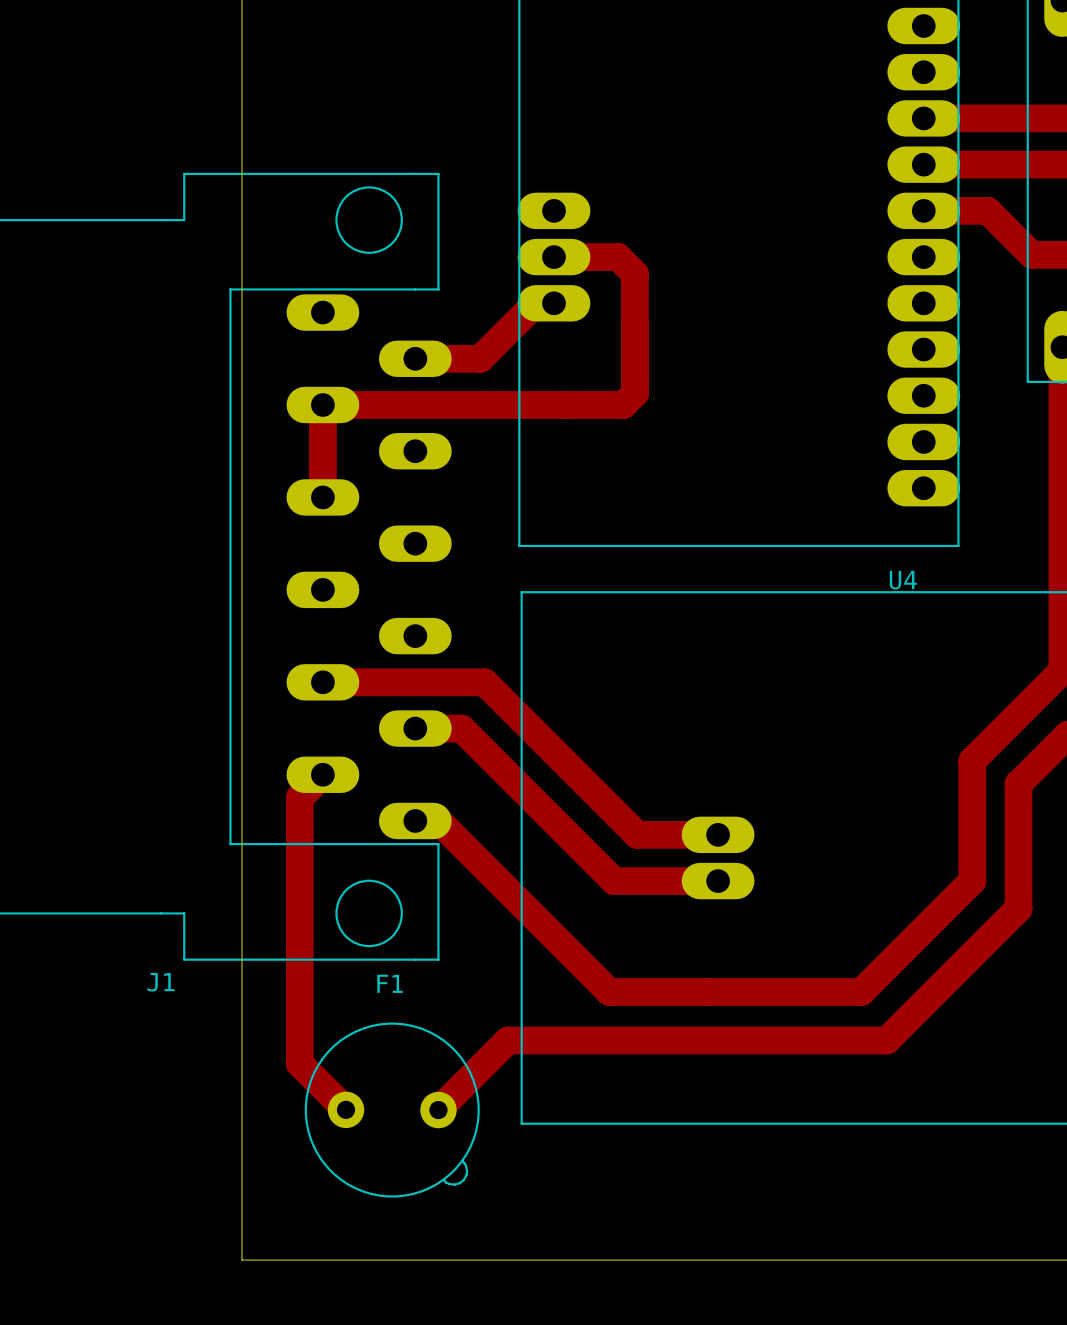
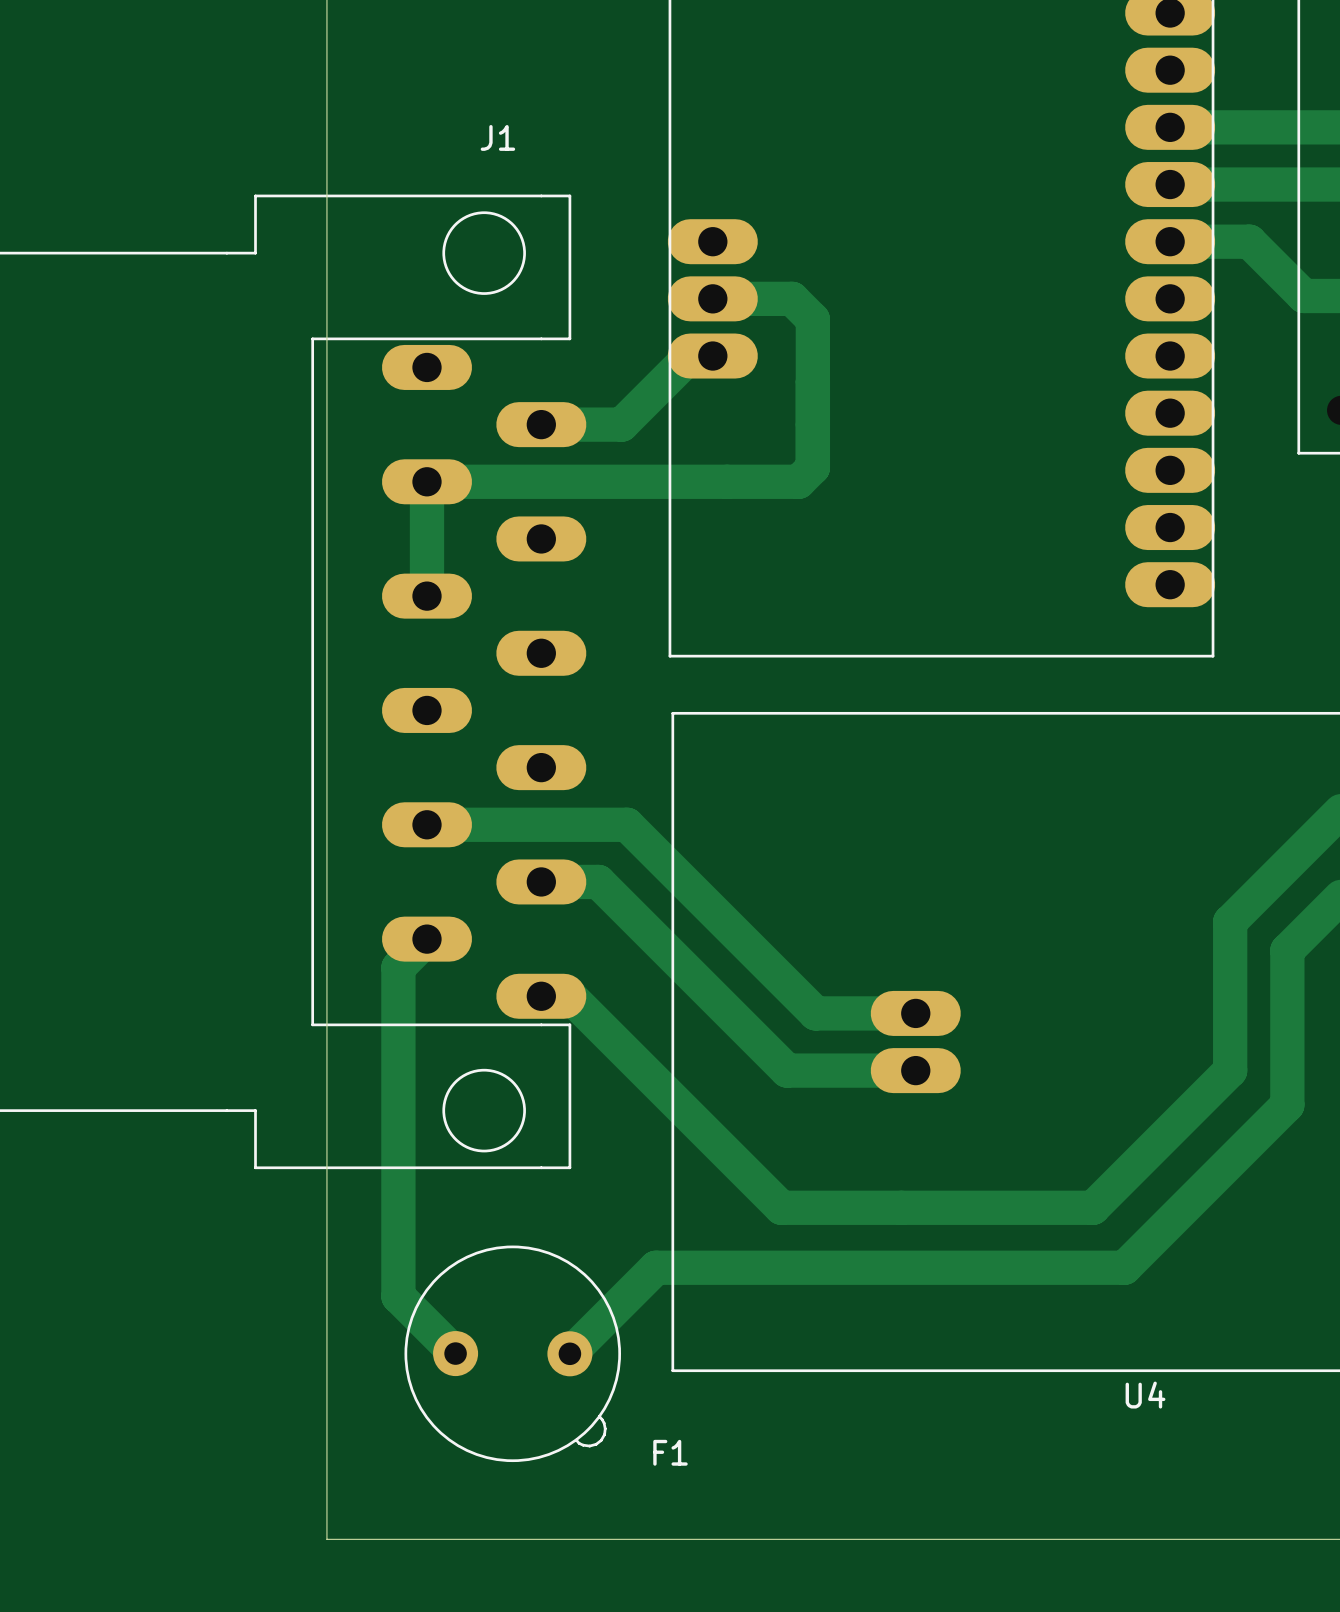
U4 name position: U4 (903, 580) -> U4 (1145, 1395)
J1 name position: J1 (160, 982) -> J1 (497, 137)
F1 name position: F1 (390, 983) -> F1 (670, 1452)

